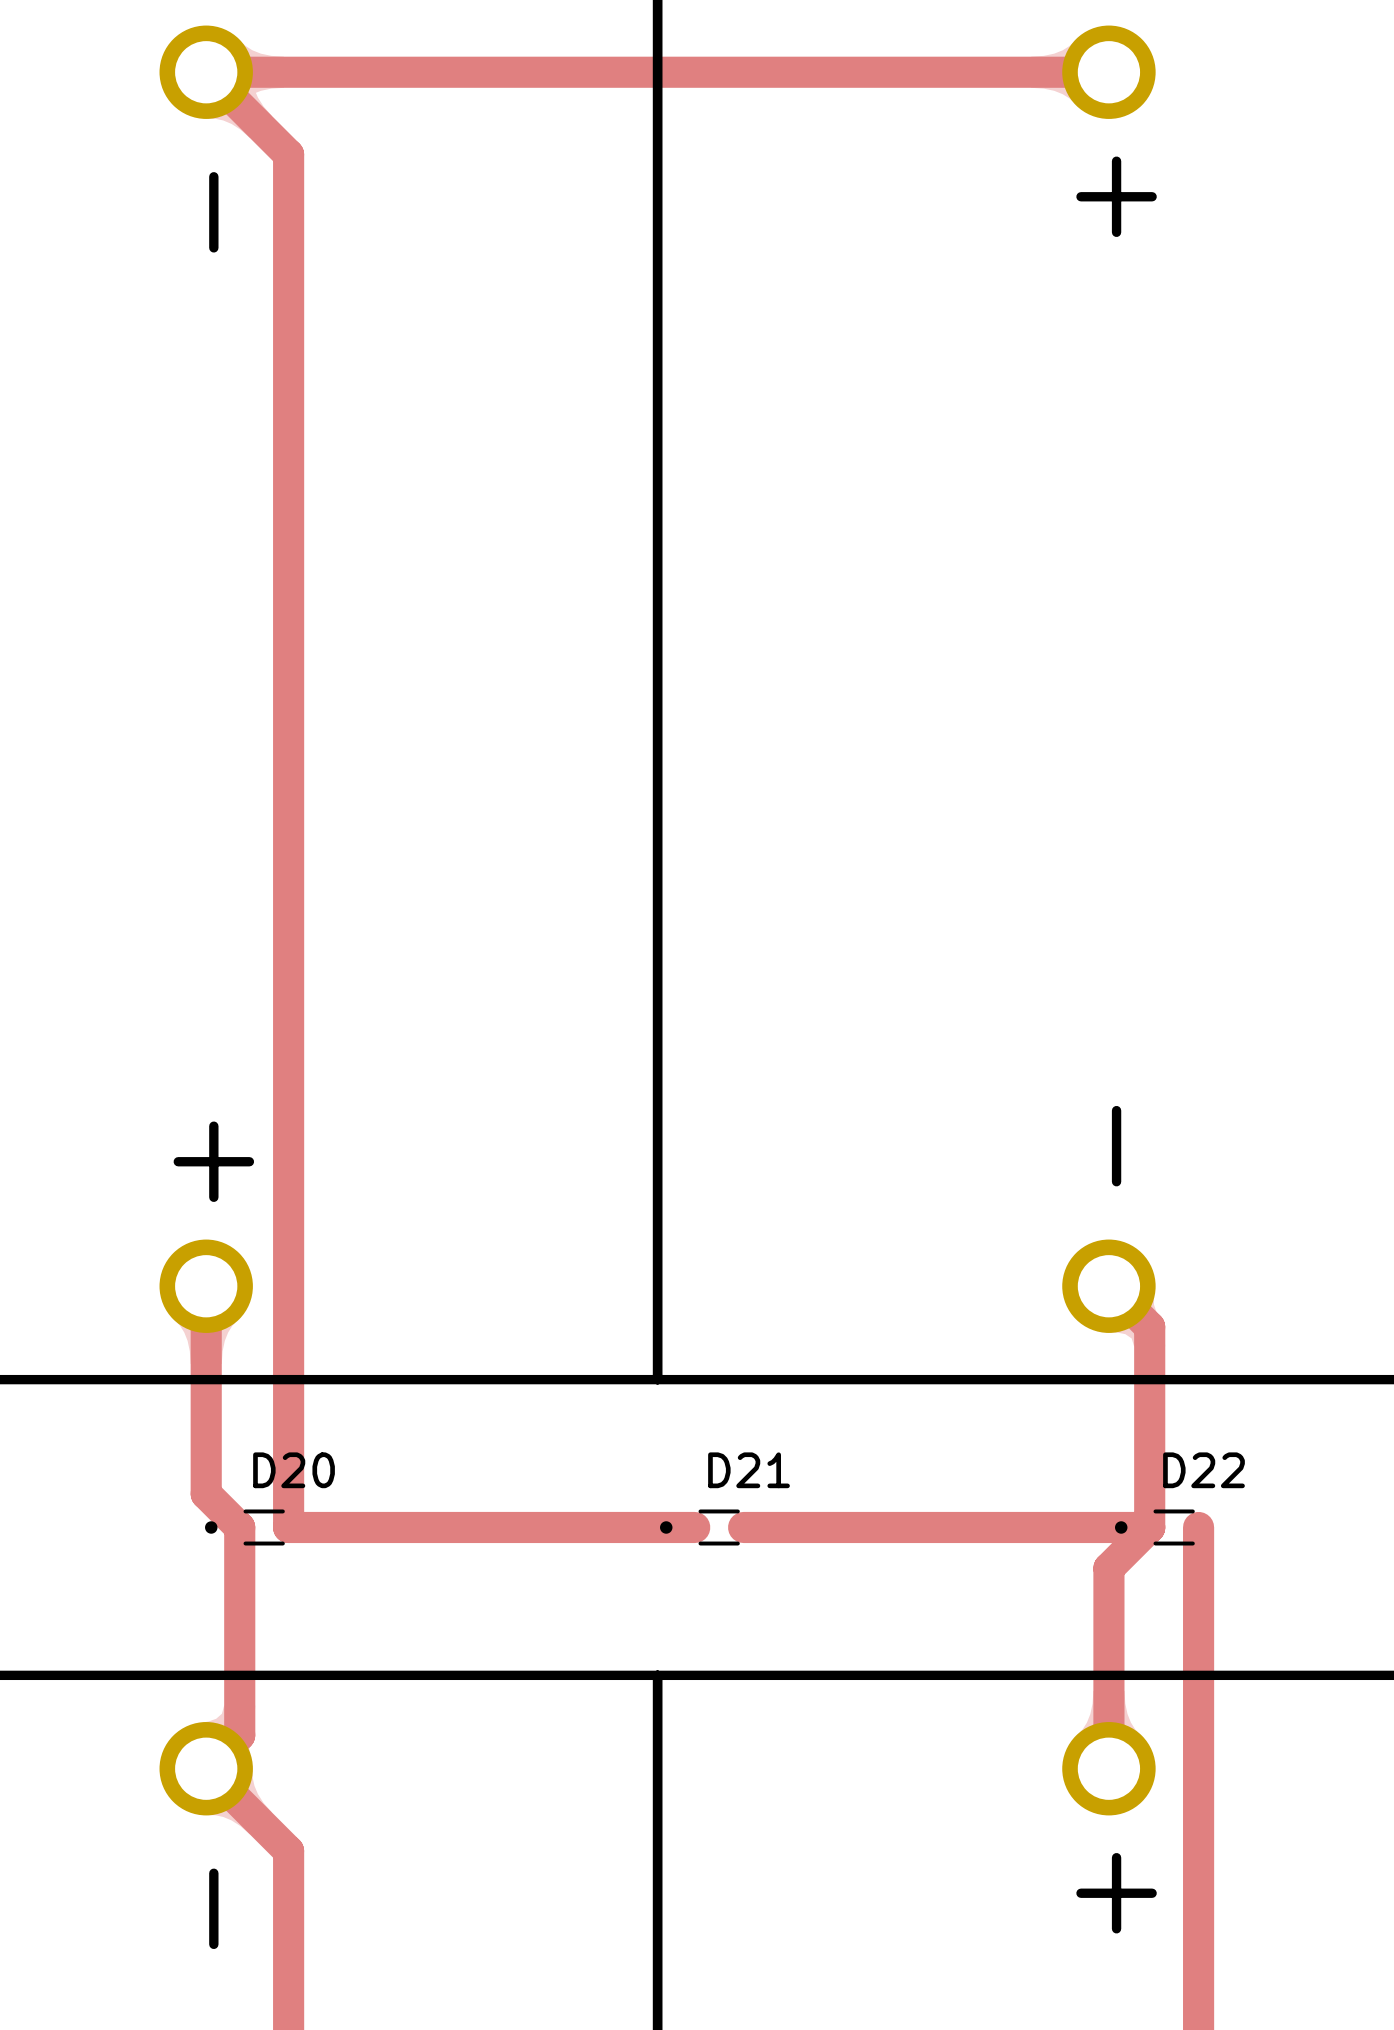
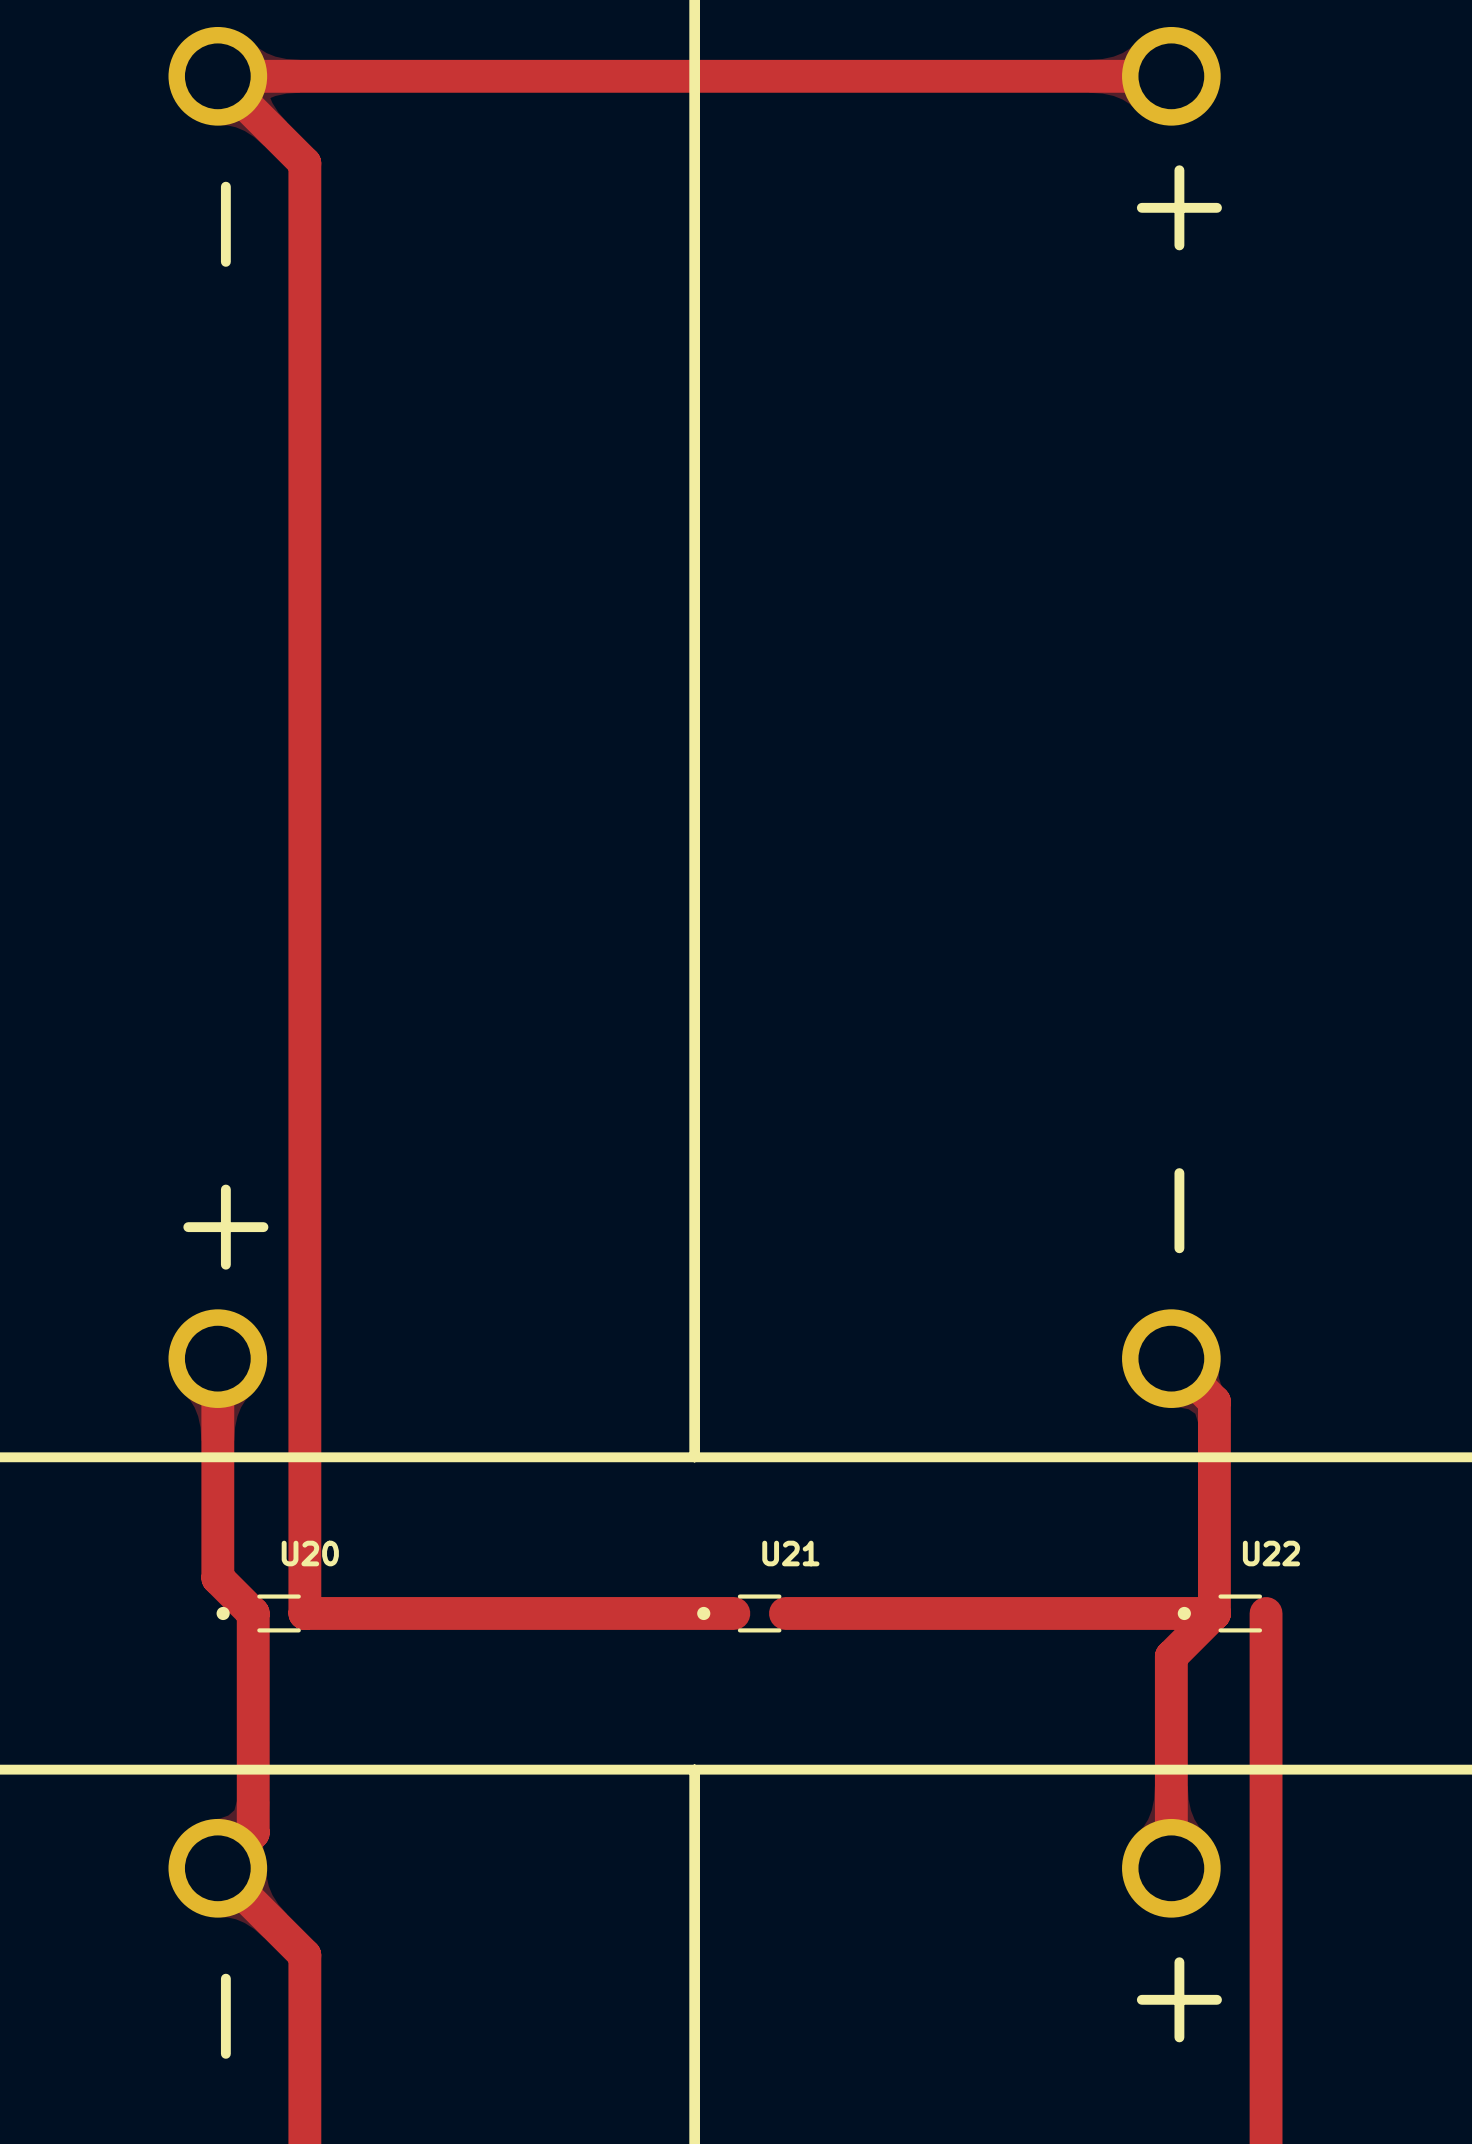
D20 name: D20 (294, 1470) -> U20 (310, 1553)
D21 name: D21 (749, 1470) -> U21 (790, 1553)
D22 name: D22 (1203, 1470) -> U22 (1271, 1553)

